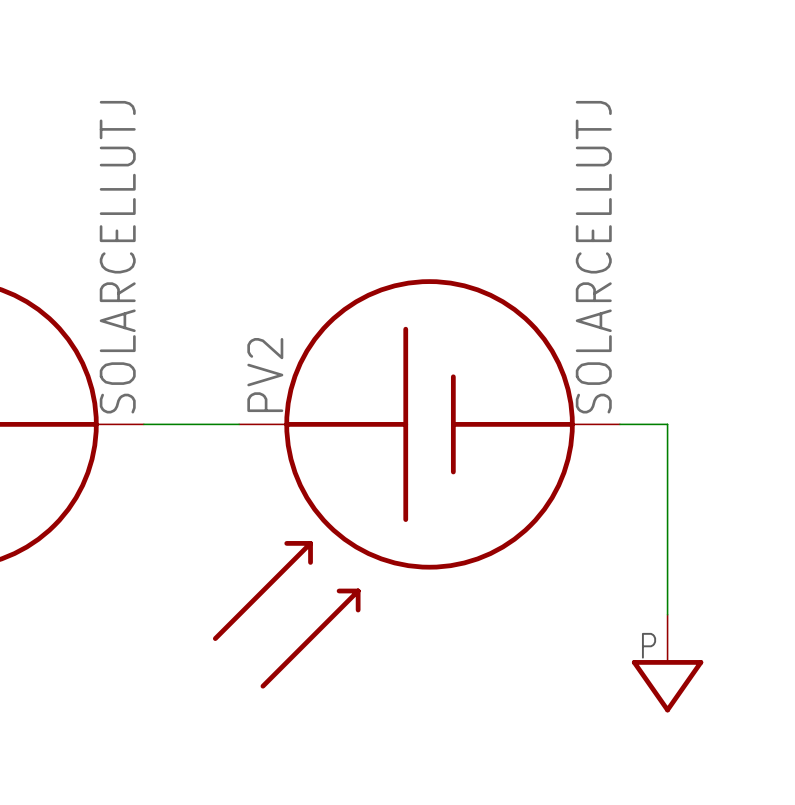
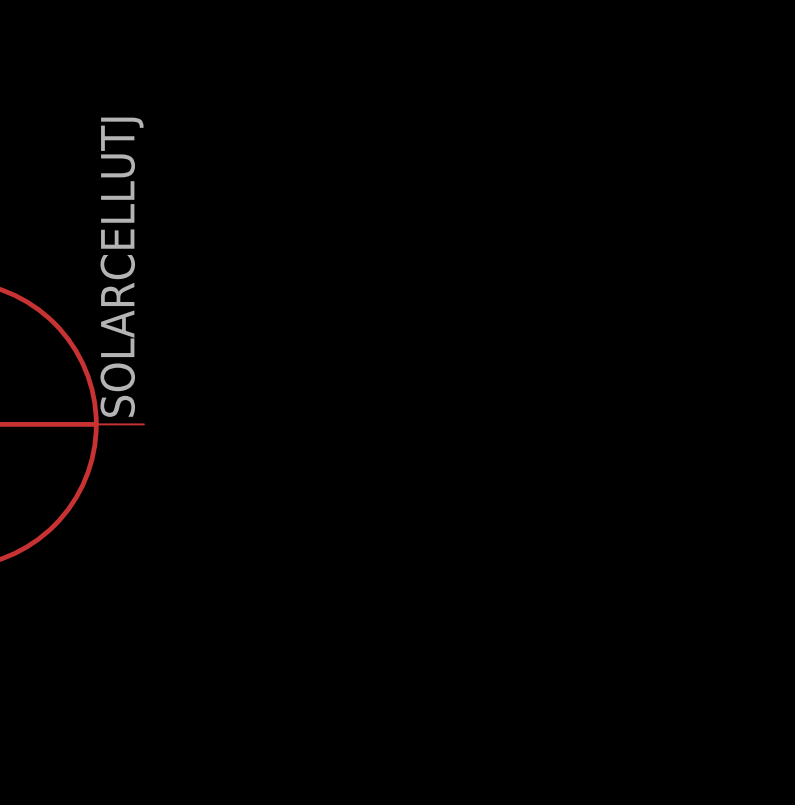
wire: (143, 424) (239, 424) -> none
wire: (619, 424) (667, 424) (667, 614) -> none
PV2: SOLARCELLUTJ (416, 483) -> none
power symbol: (667, 663) -> none

